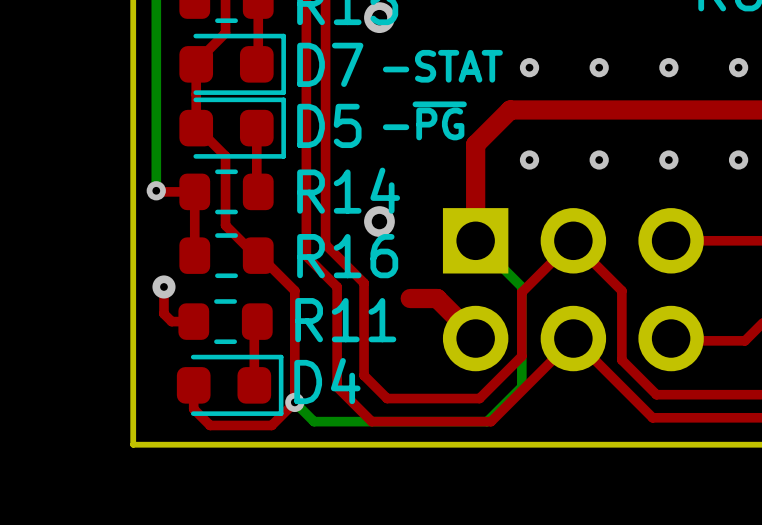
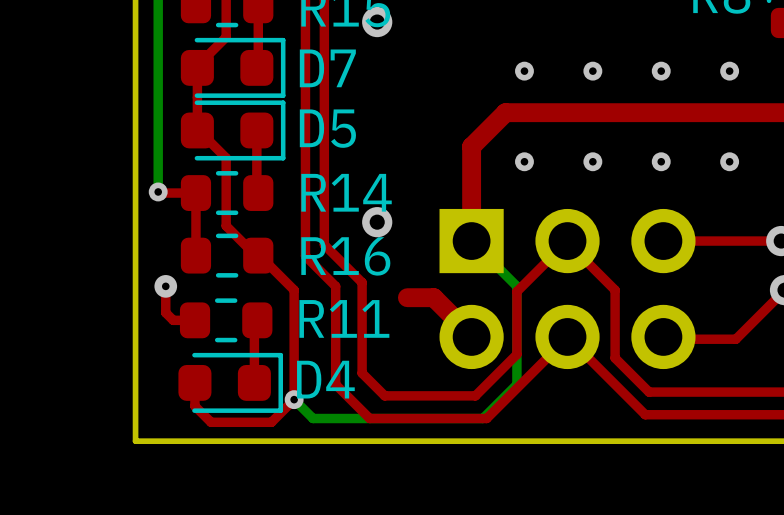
text: -STAT (442, 66) -> none
text: -~{PG} (424, 120) -> none

